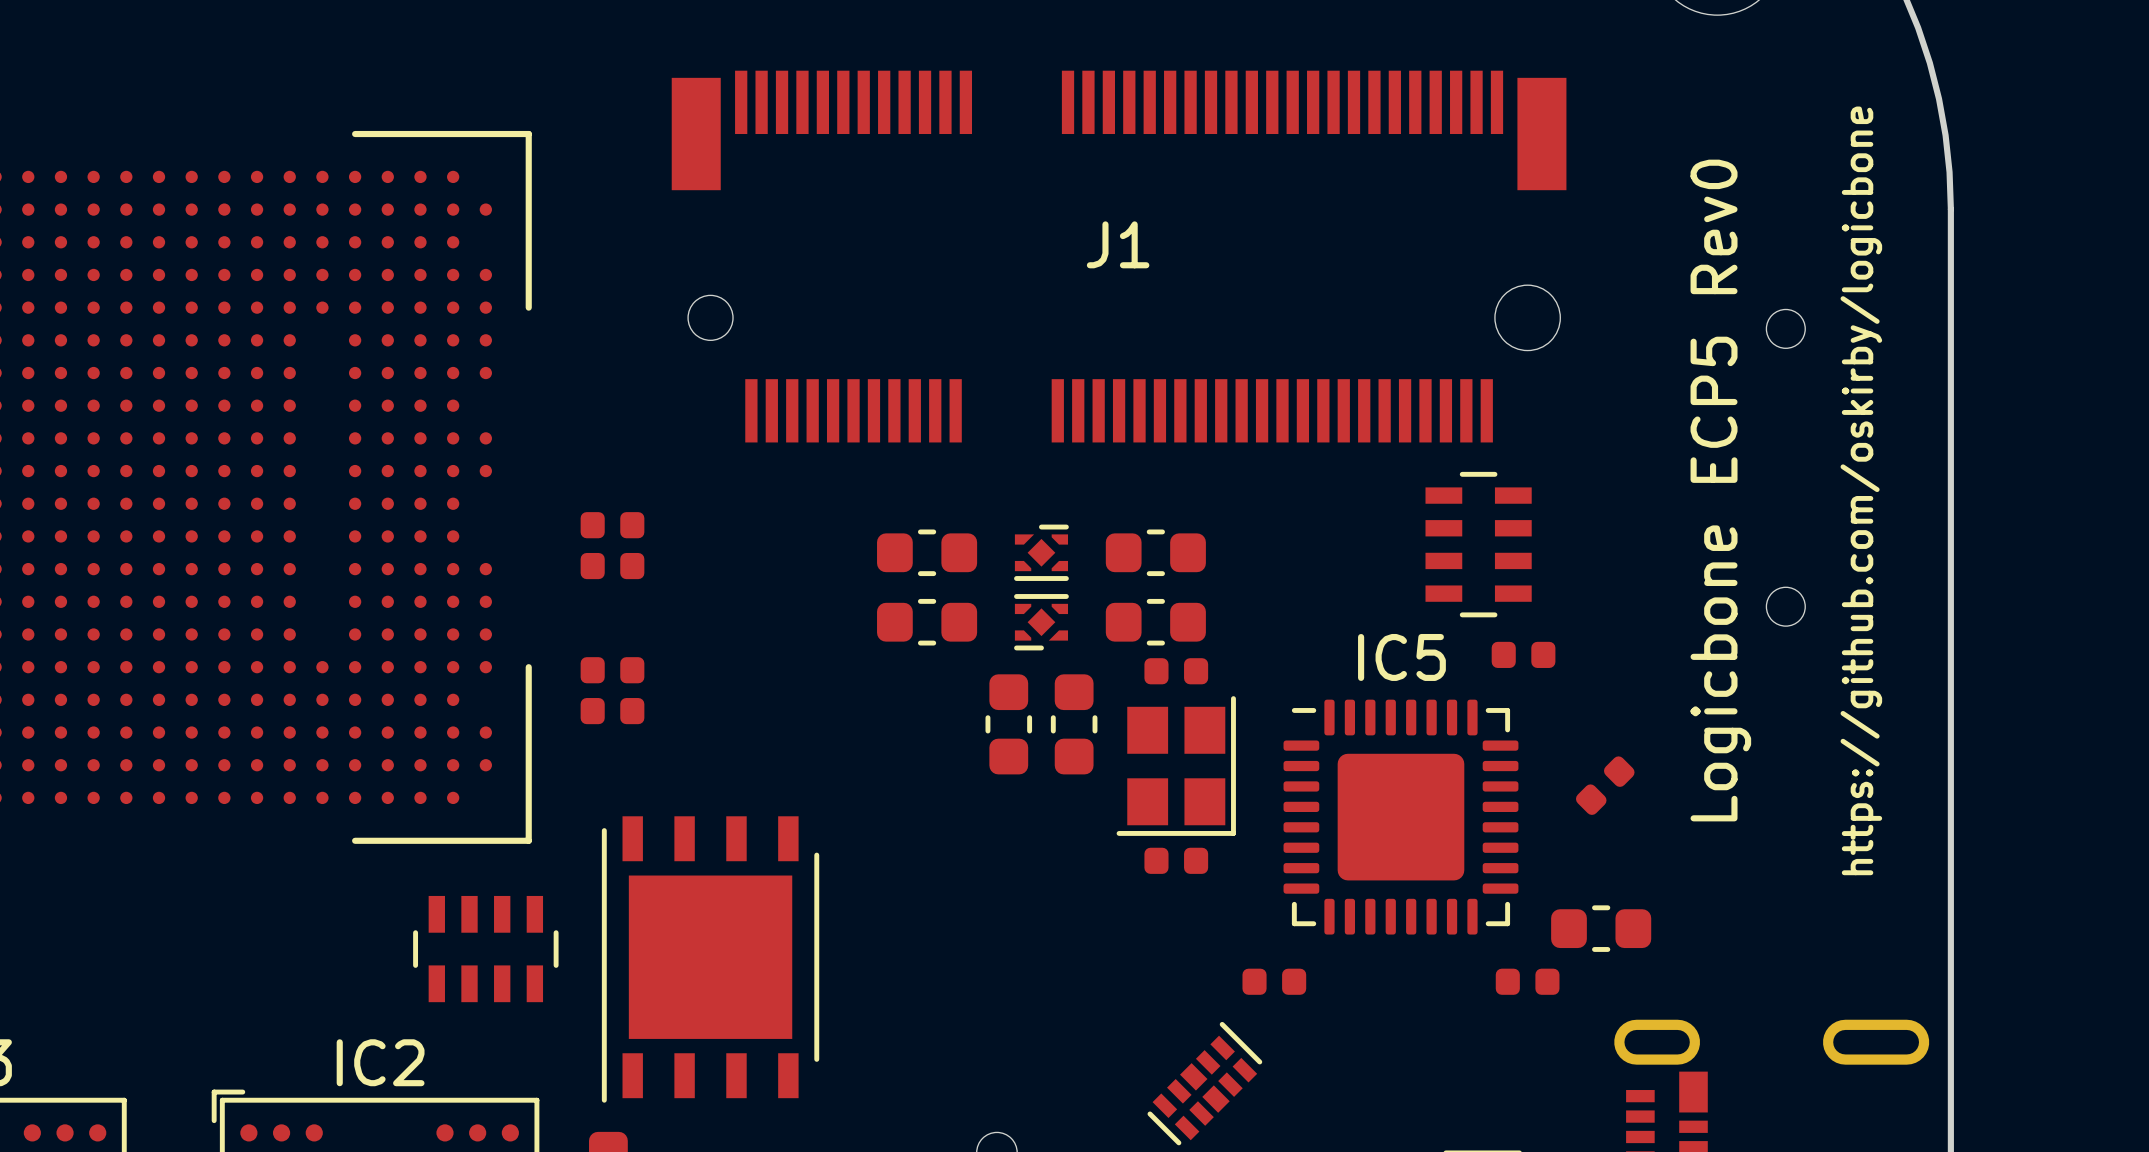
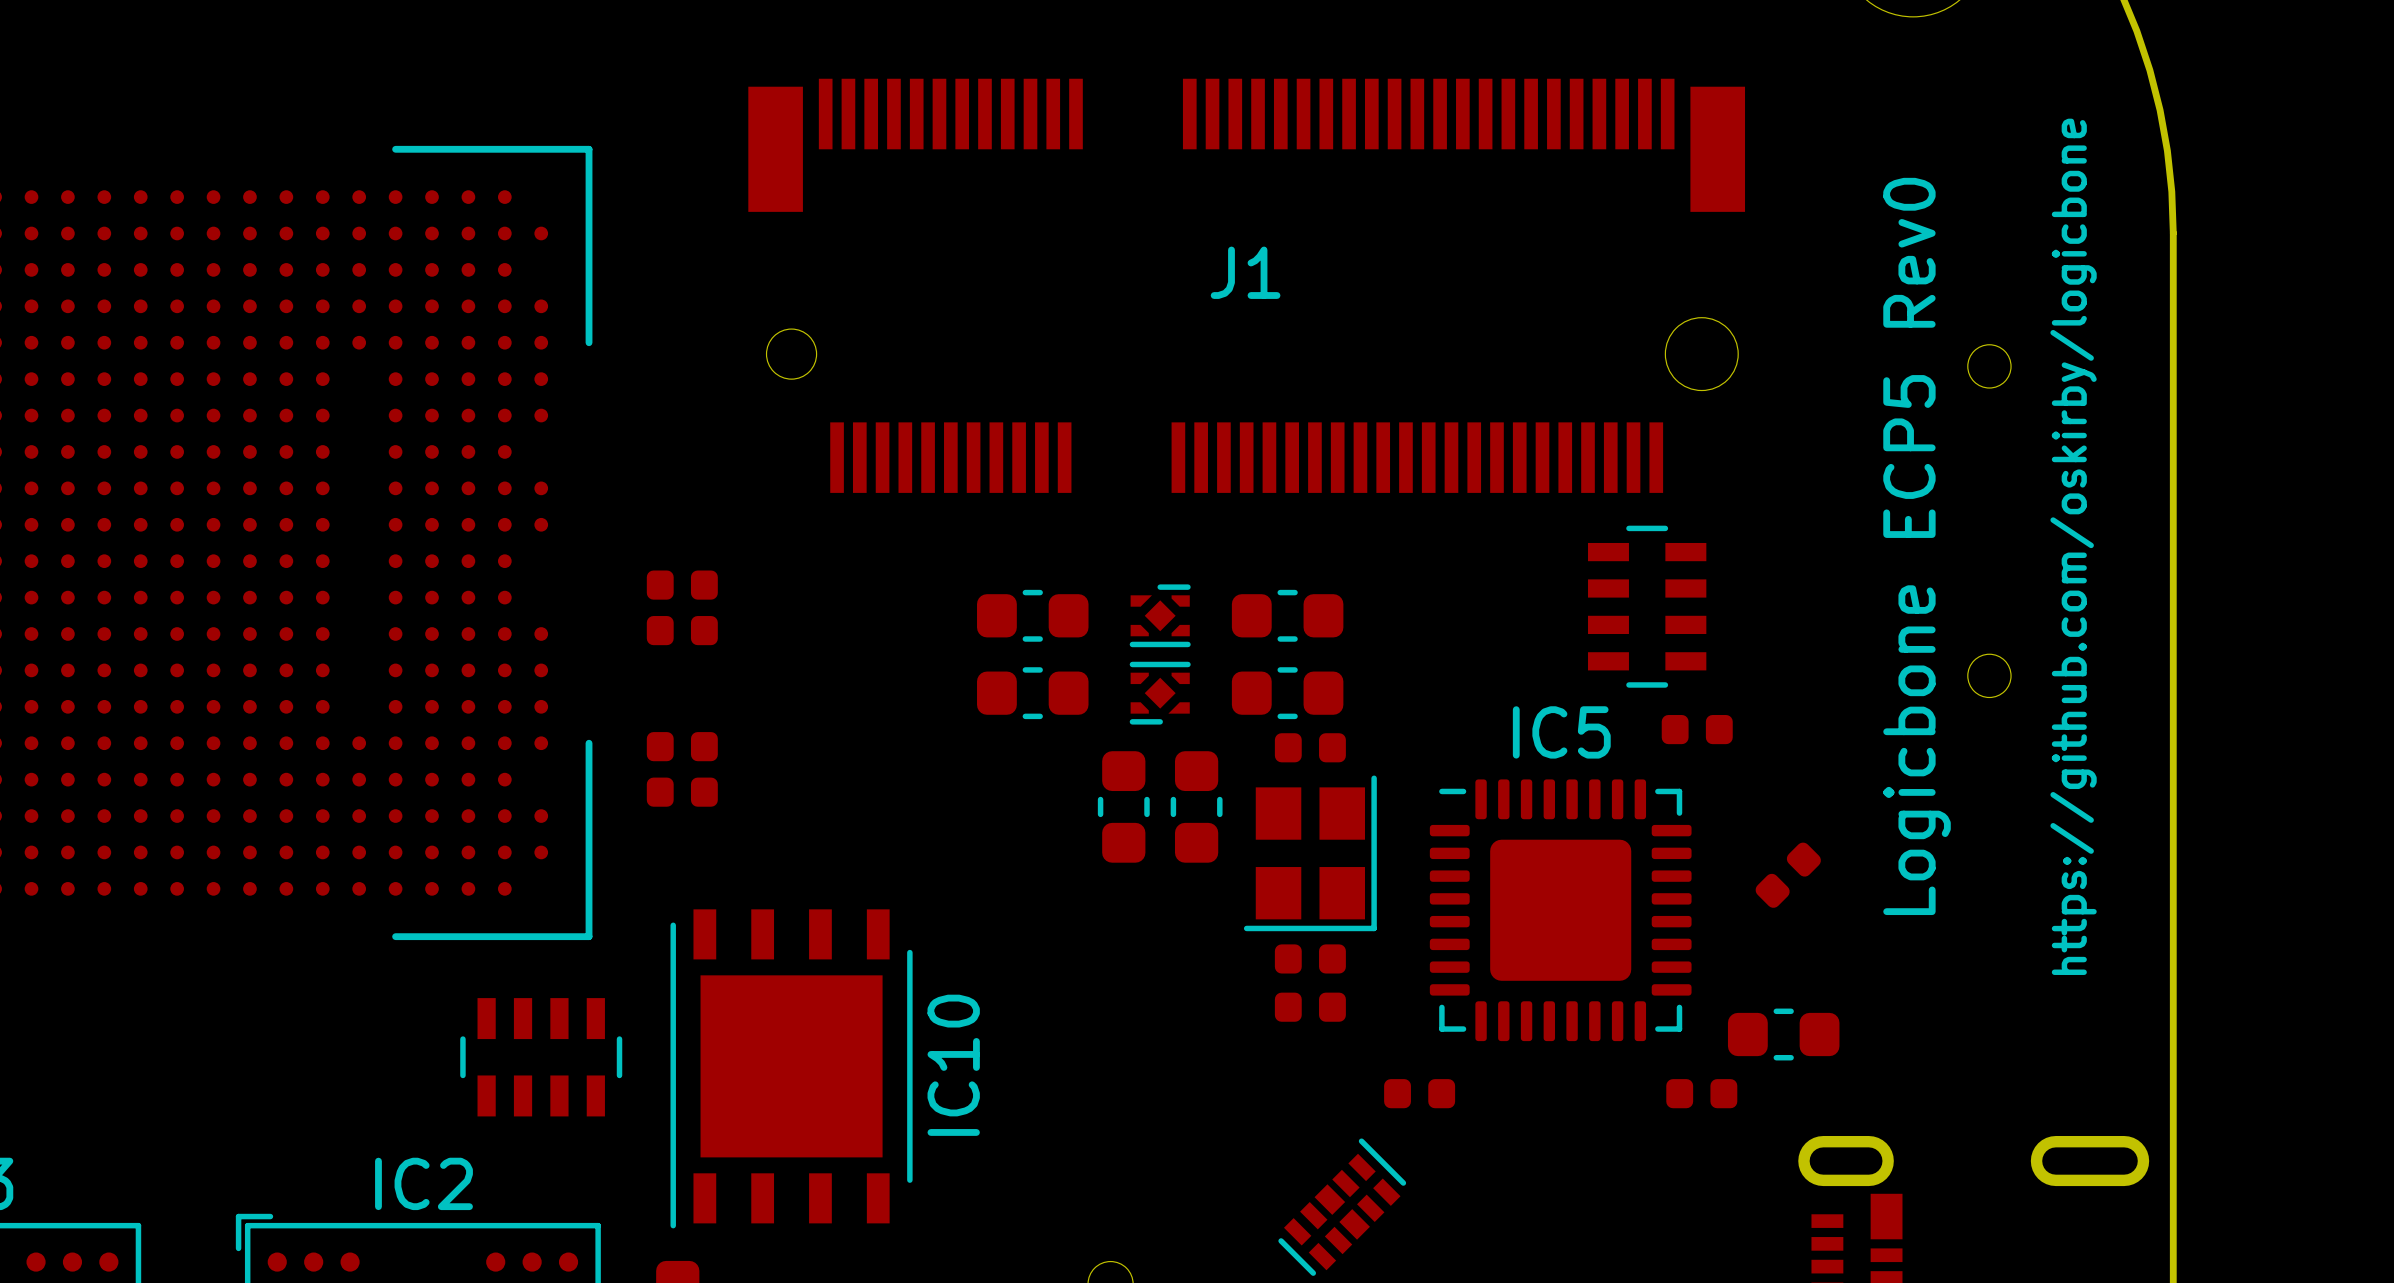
part: none -> (1310, 1007)
IC10 name: none -> IC10 (953, 1065)

